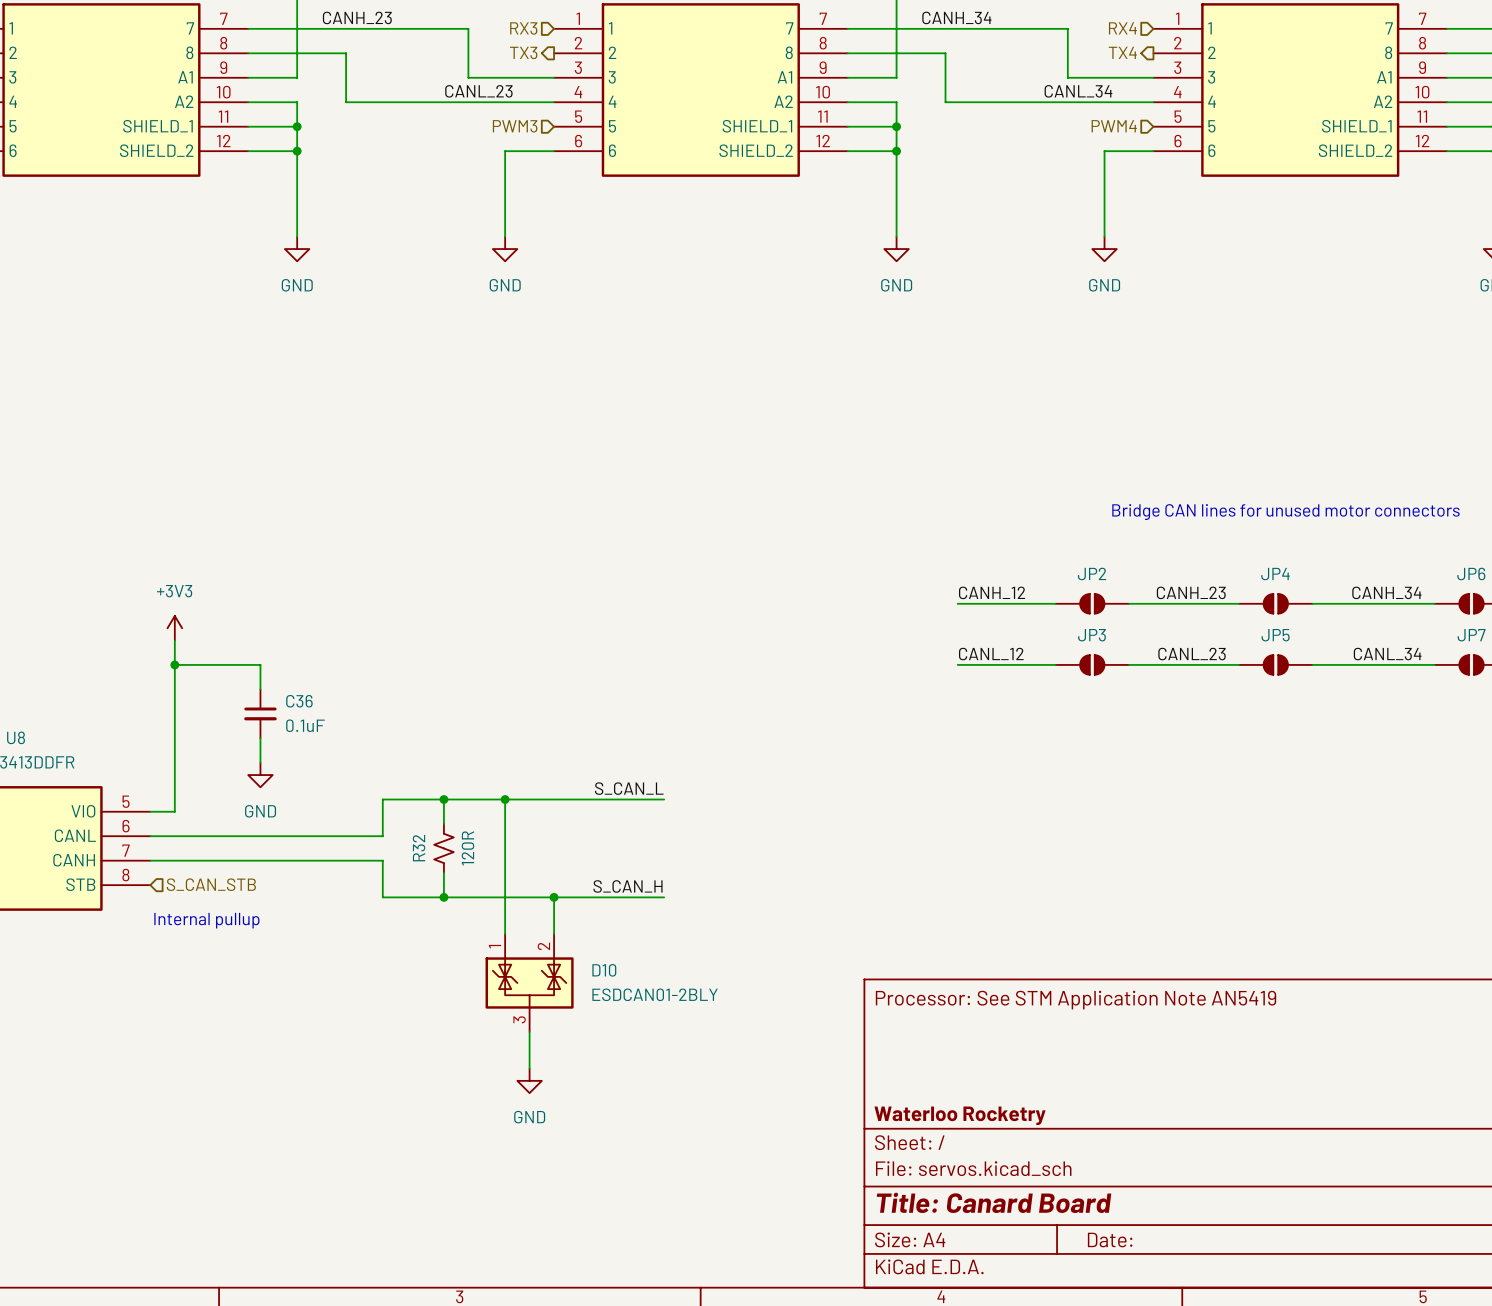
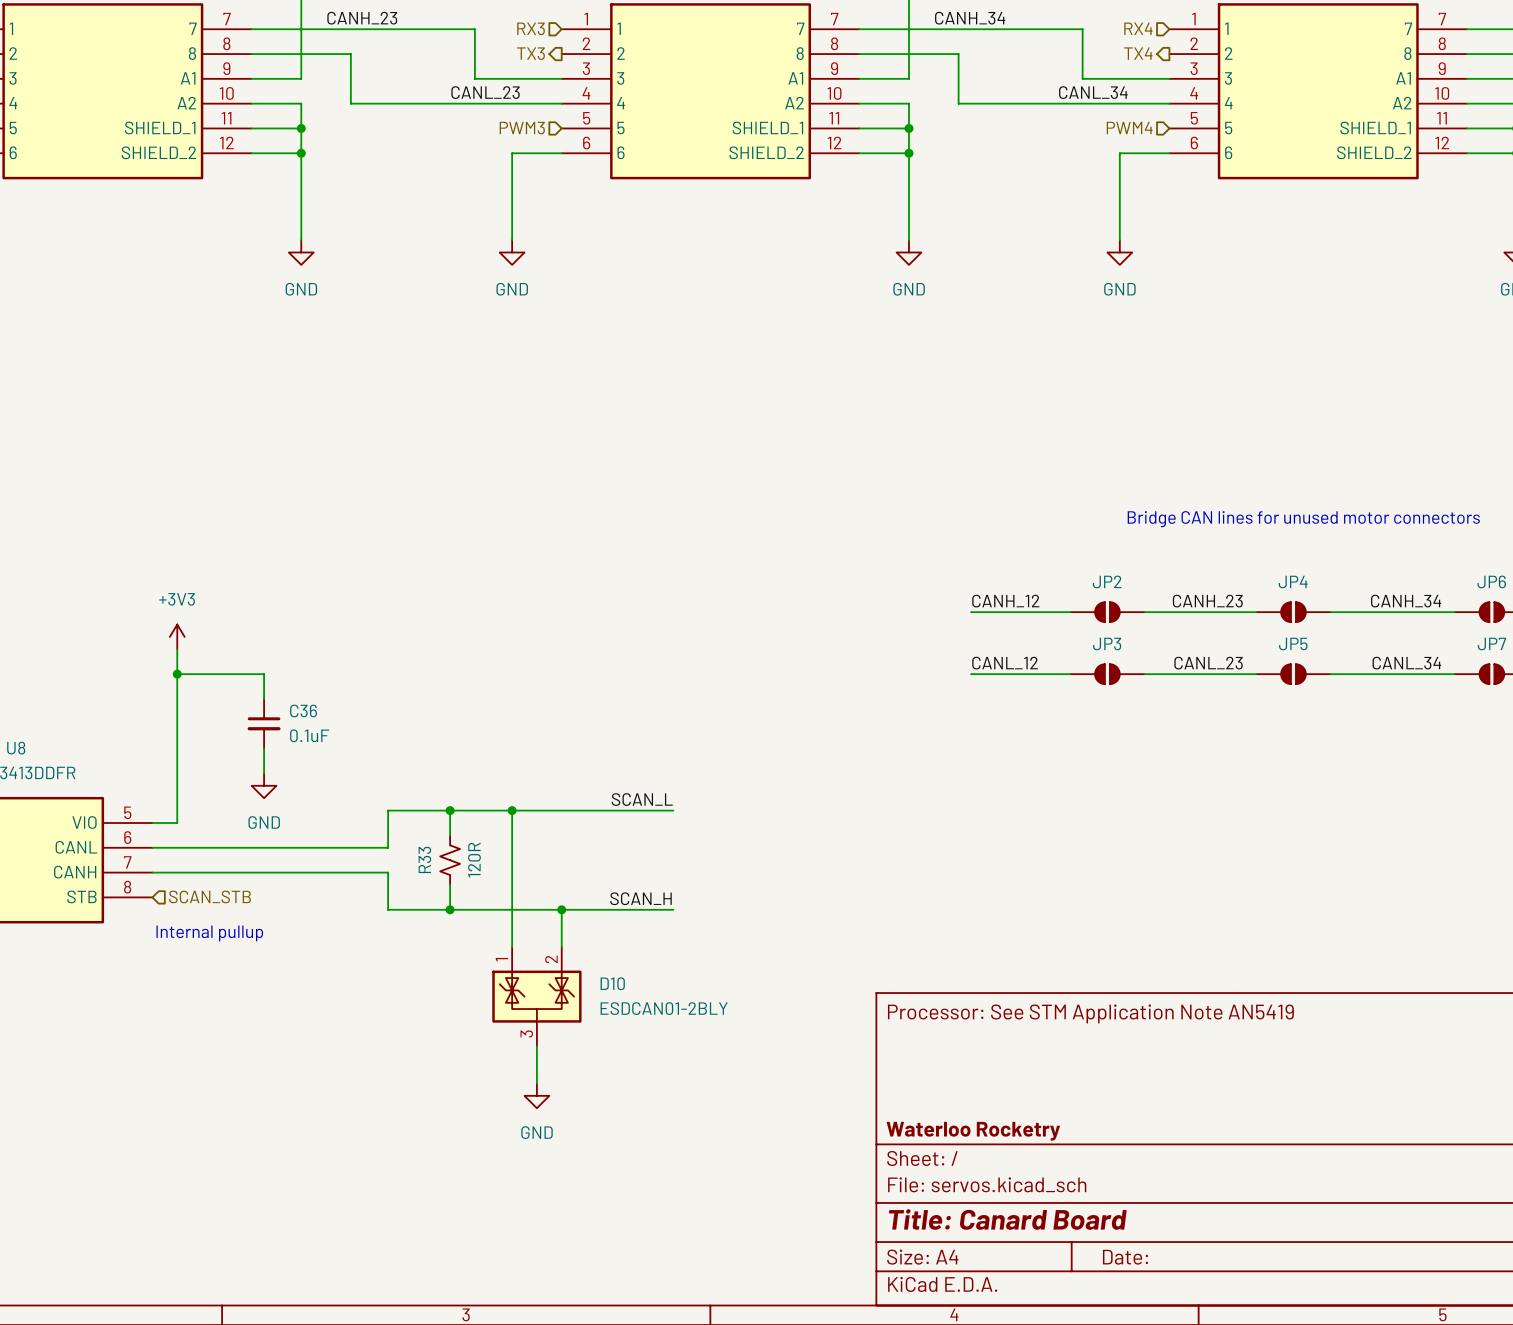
label: S_CAN_L (629, 788) -> SCAN_L (642, 799)
R32 name: R32 (419, 848) -> R33 (424, 859)
hierarchical label: S_CAN_STB (211, 884) -> SCAN_STB (209, 896)
label: S_CAN_H (628, 886) -> SCAN_H (641, 898)

